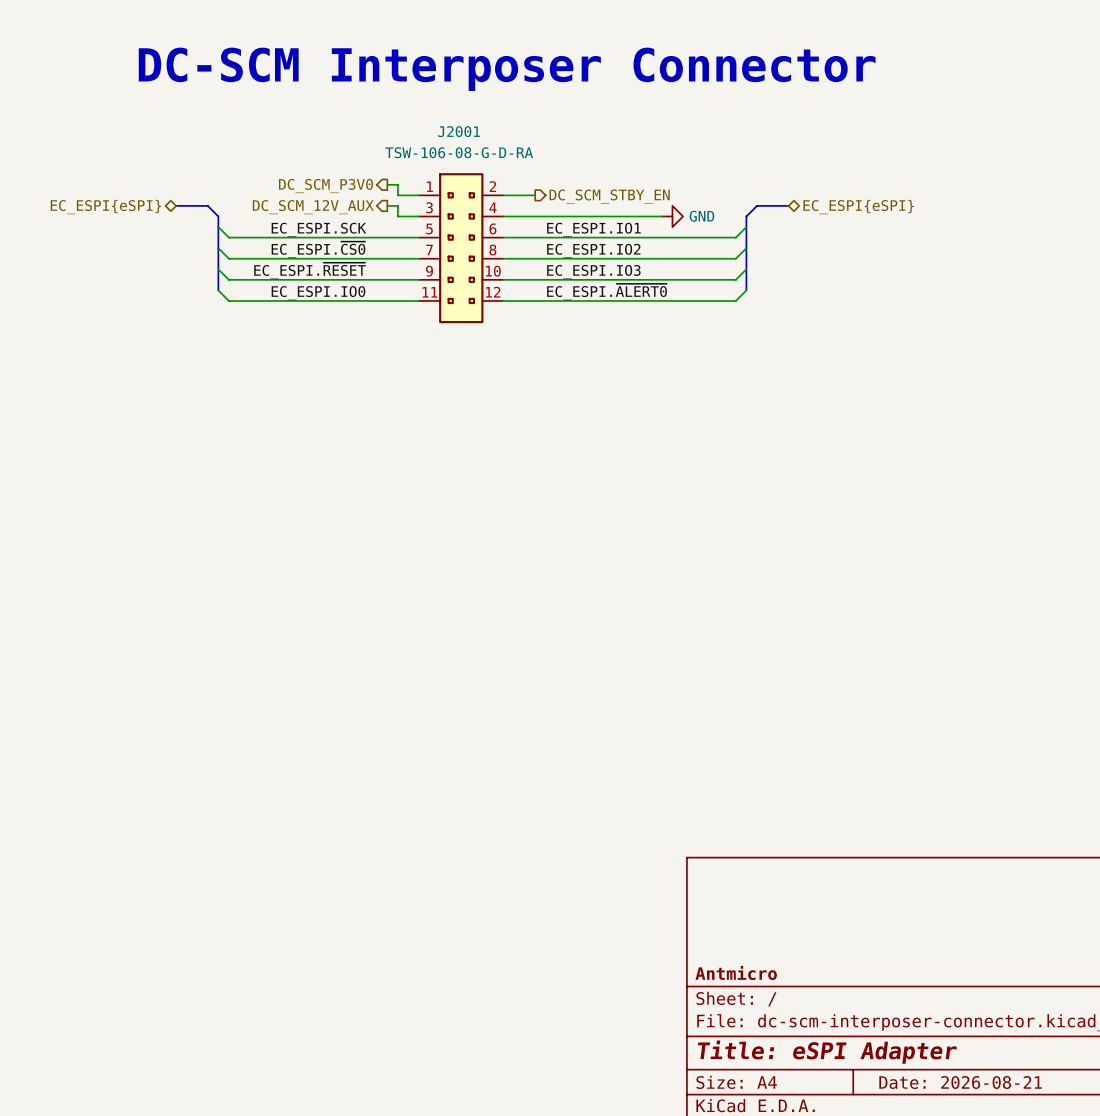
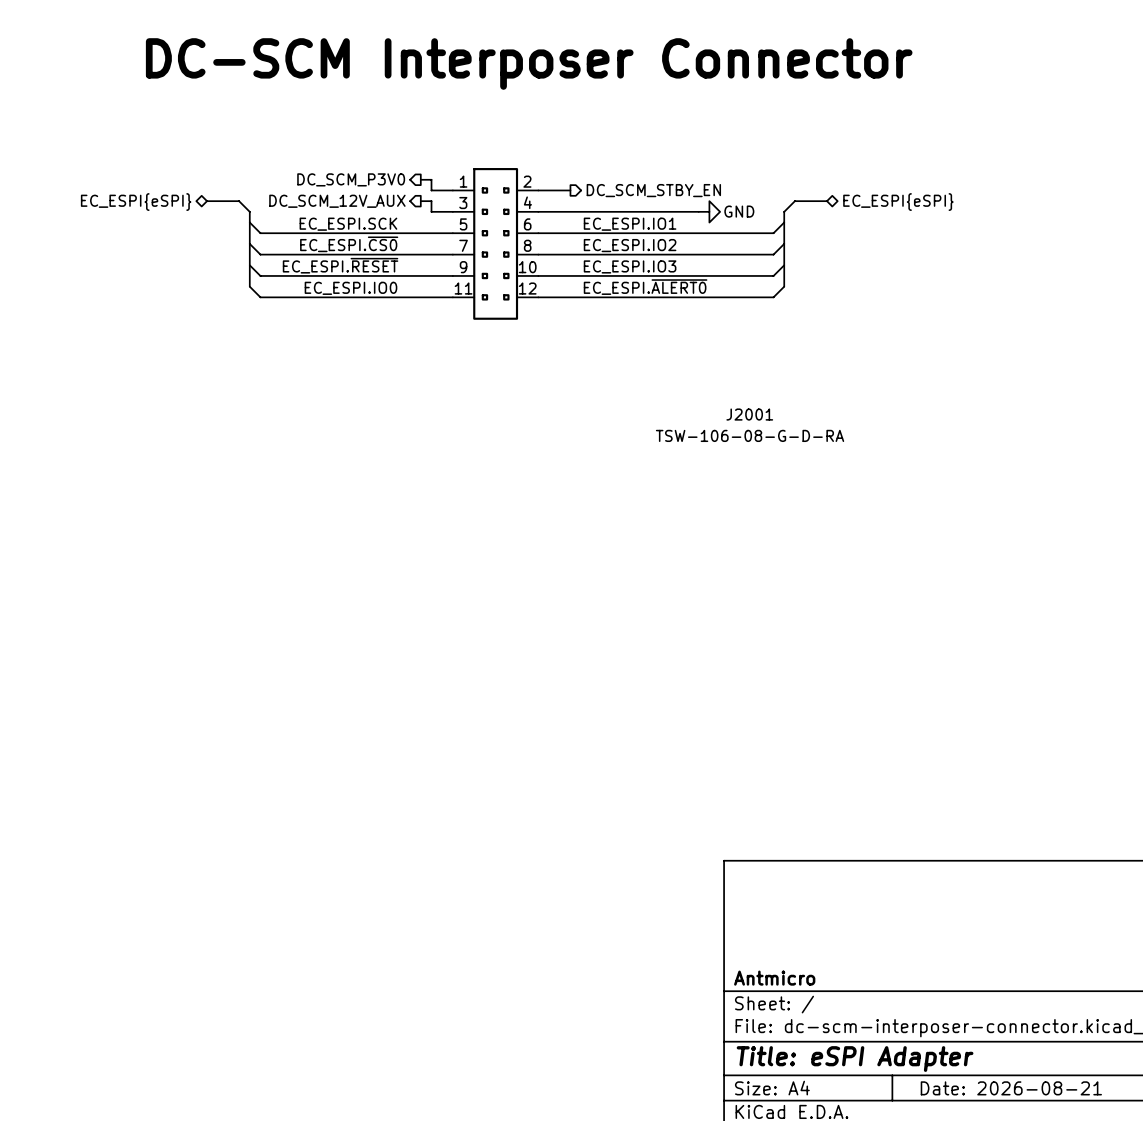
J2001 name position: J2001 (459, 131) -> J2001 (749, 414)
J2001 text position: TSW-106-08-G-D-RA (459, 152) -> TSW-106-08-G-D-RA (750, 435)

